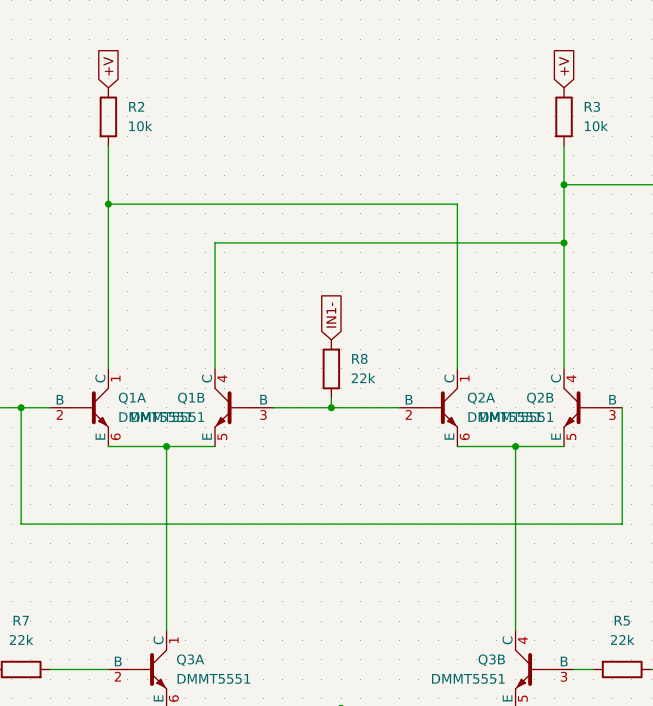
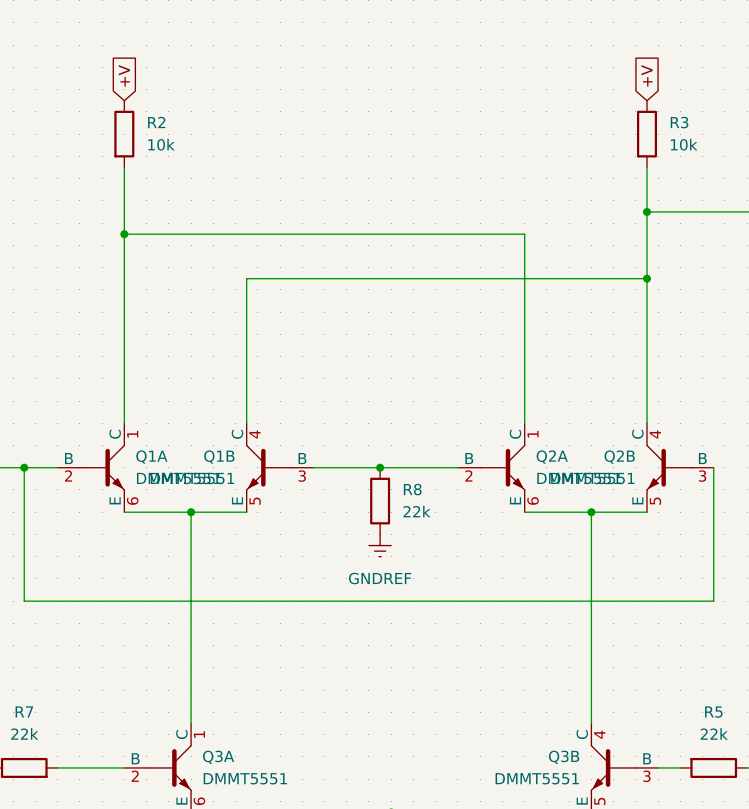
global label: IN1- (331, 315) -> none
R8 position: (331, 368) -> (380, 501)
wire: (331, 398) (331, 407) -> none
power symbol: none -> GNDREF (380, 545)

